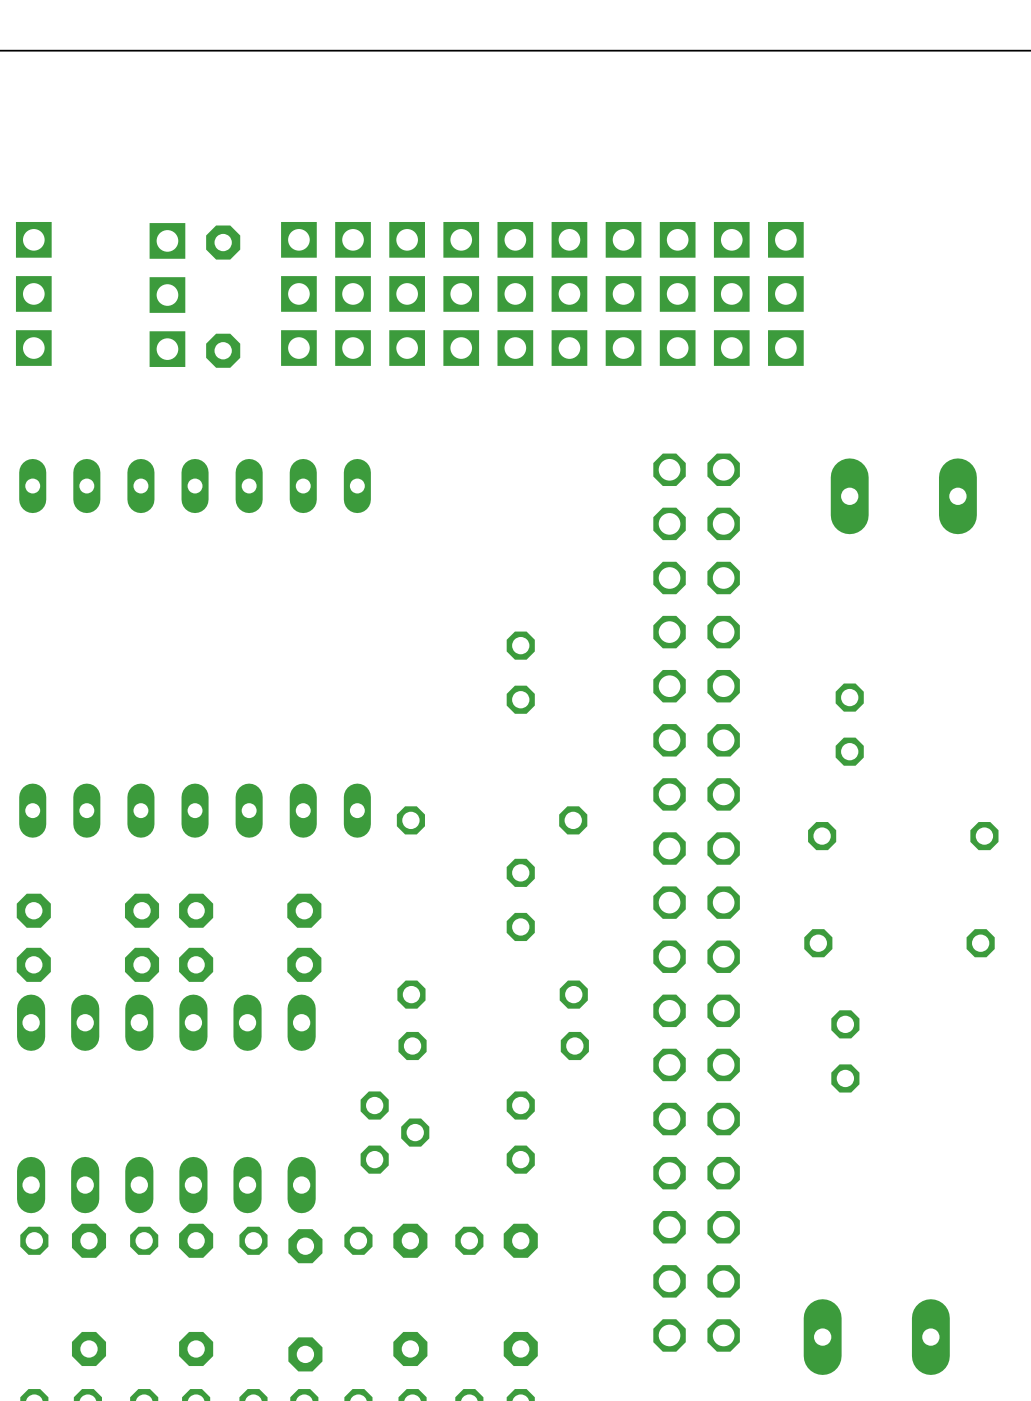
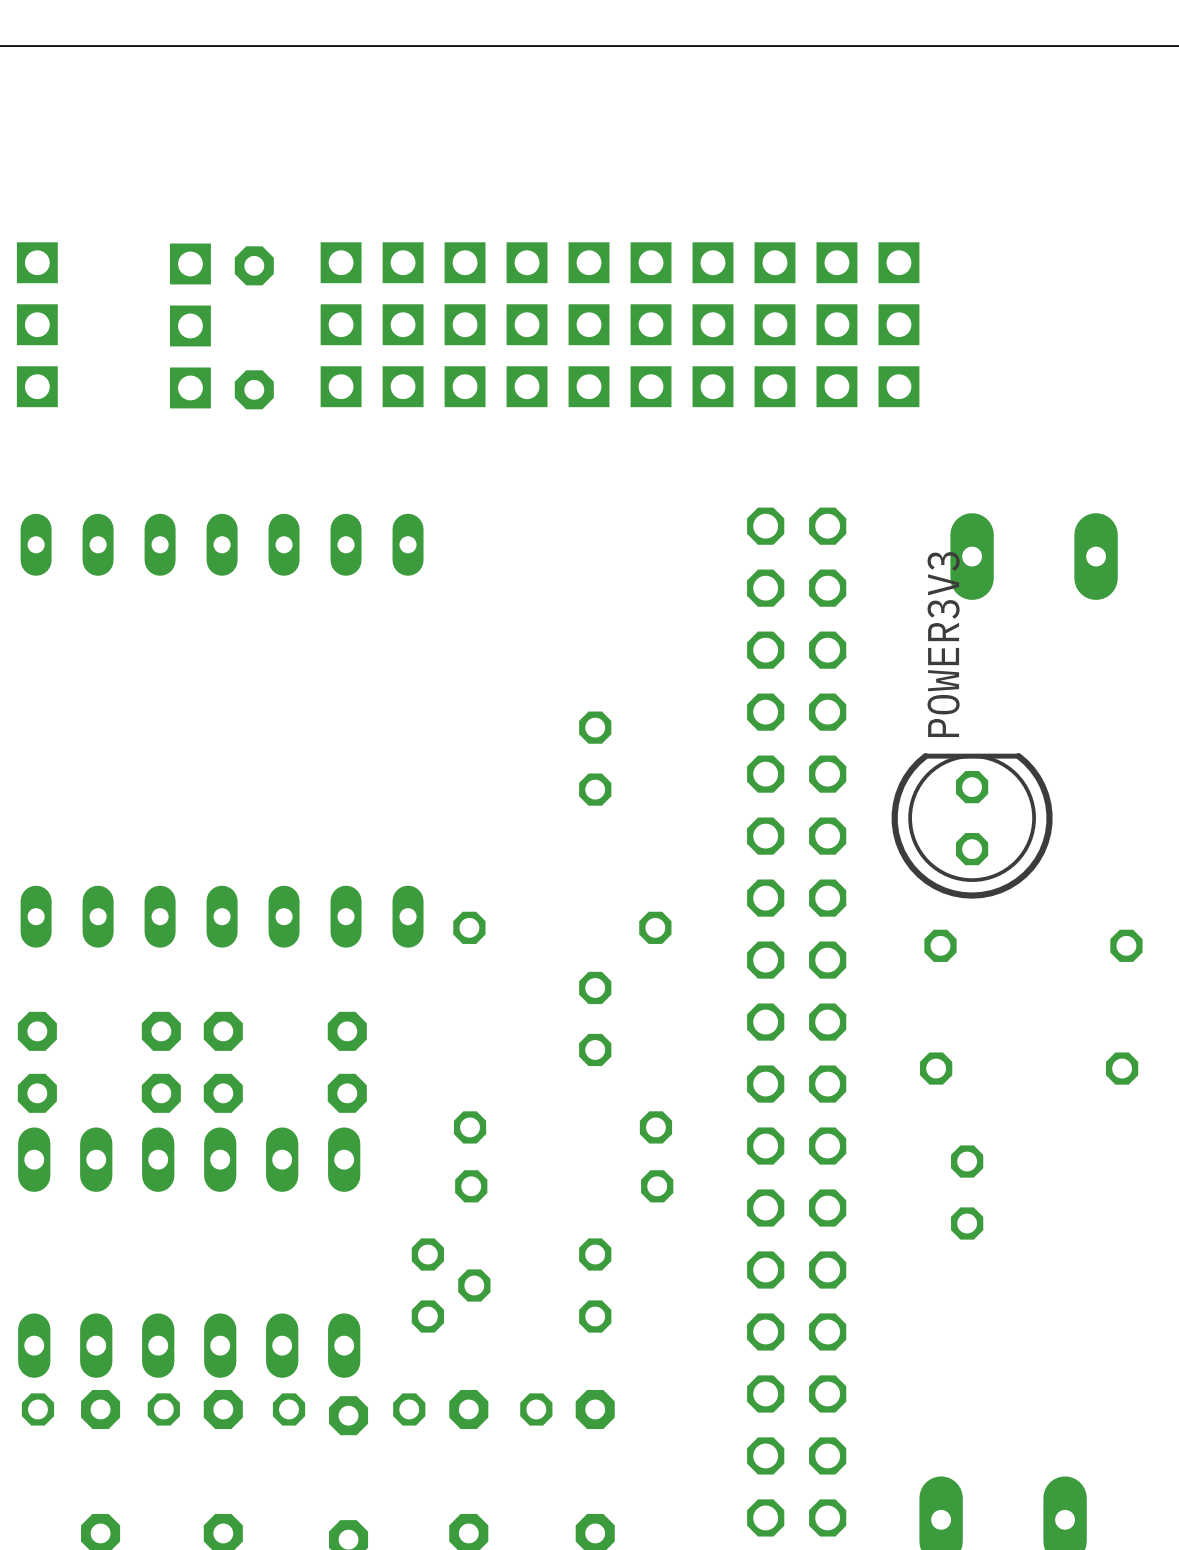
POWER3V3 side: top (849, 724) -> bottom (972, 825)

